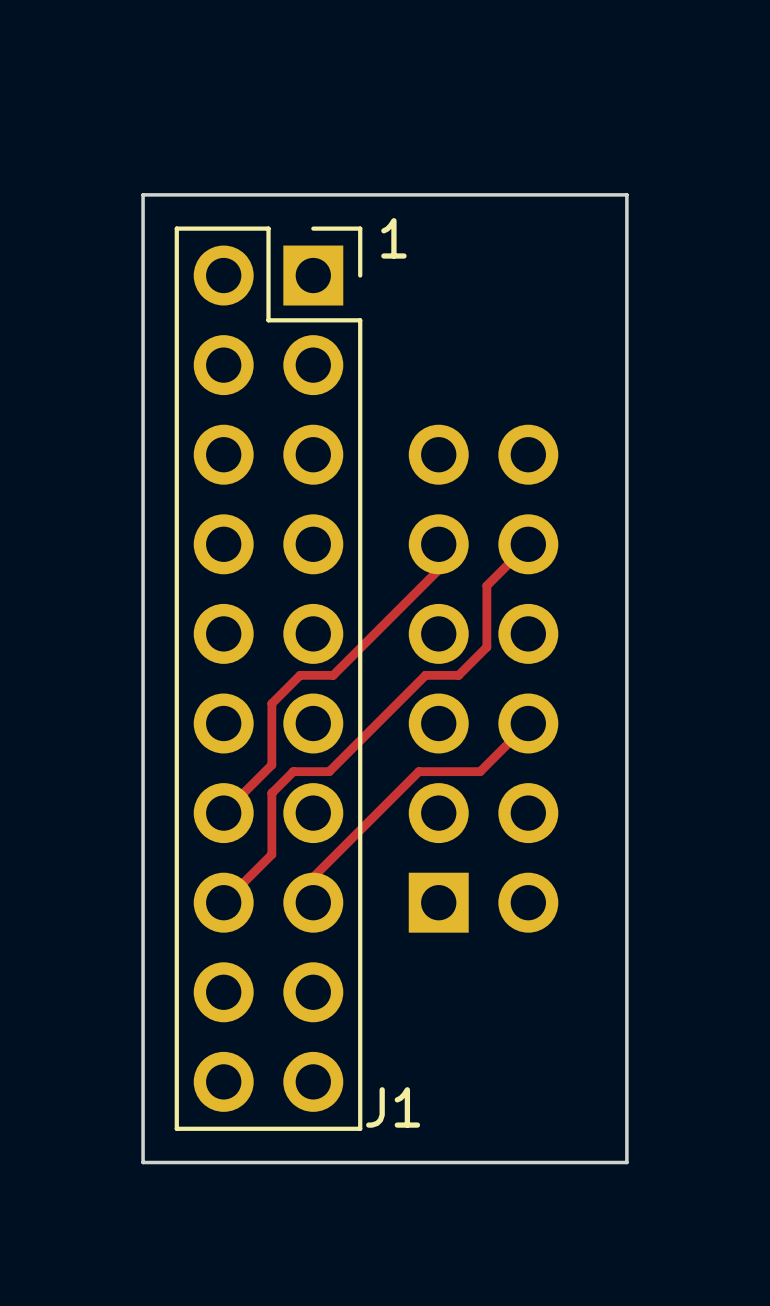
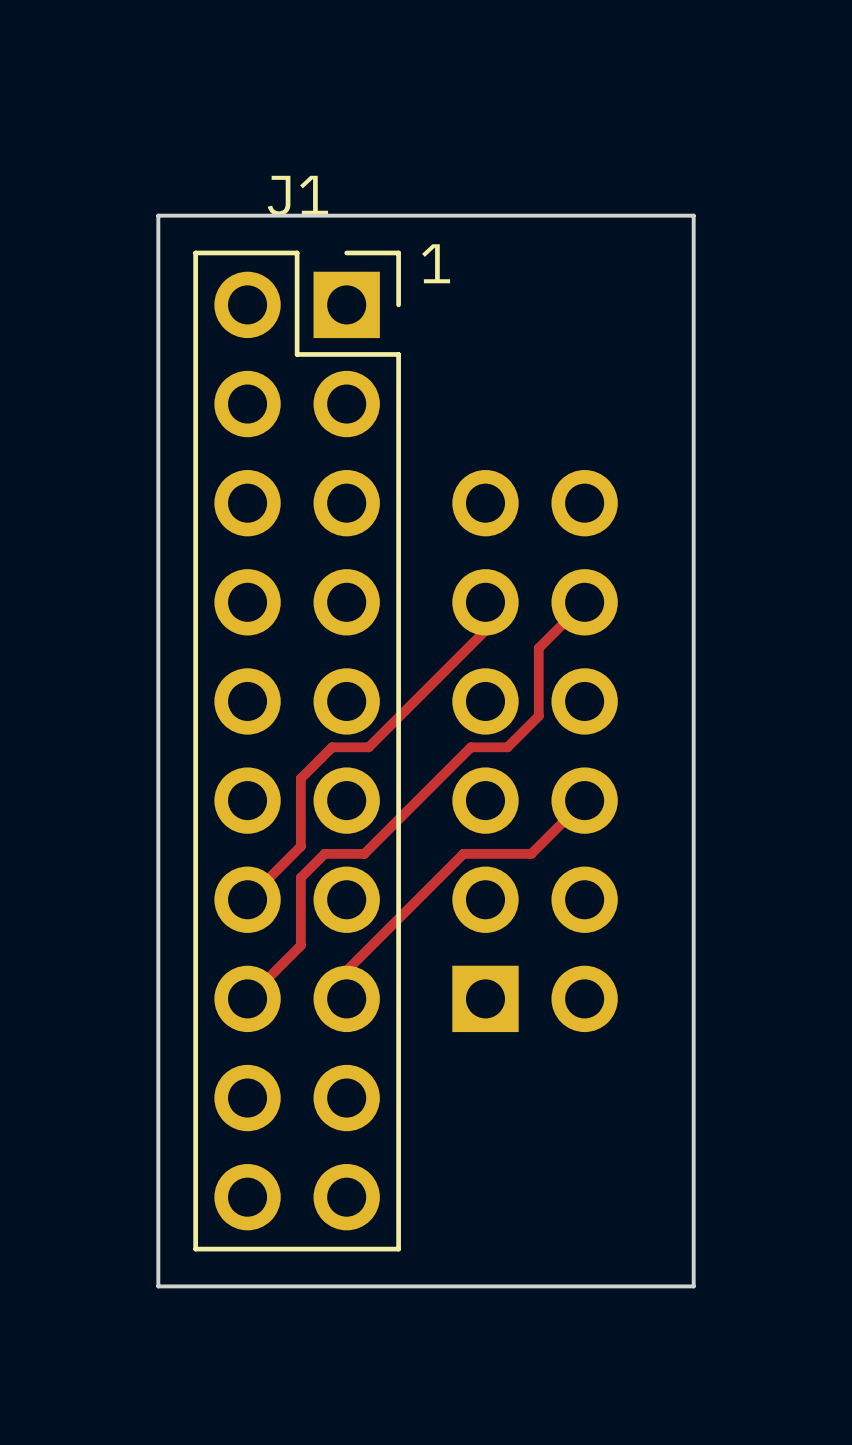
J1 name position: J1 (393, 1107) -> J1 (297, 195)

